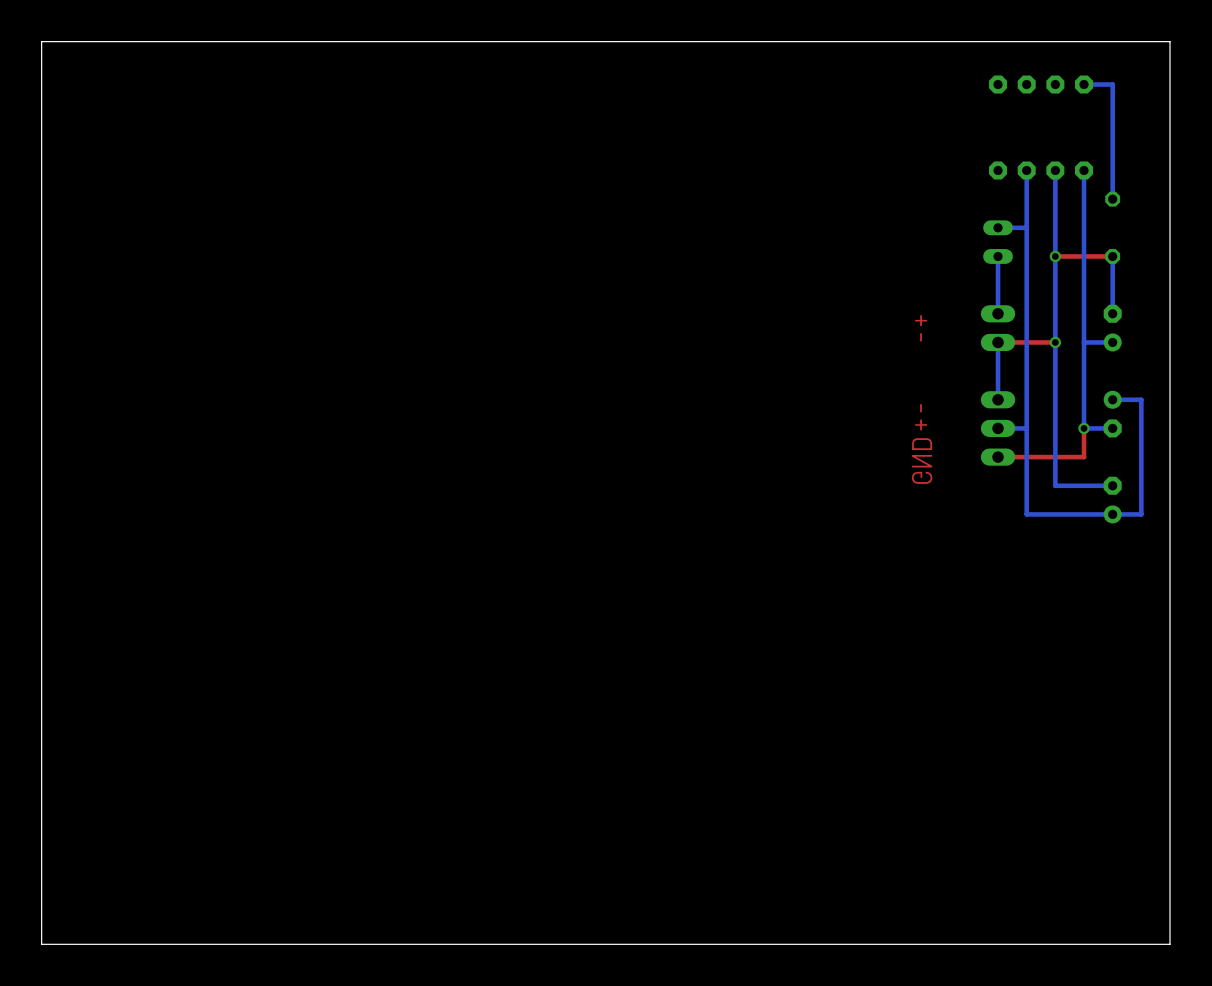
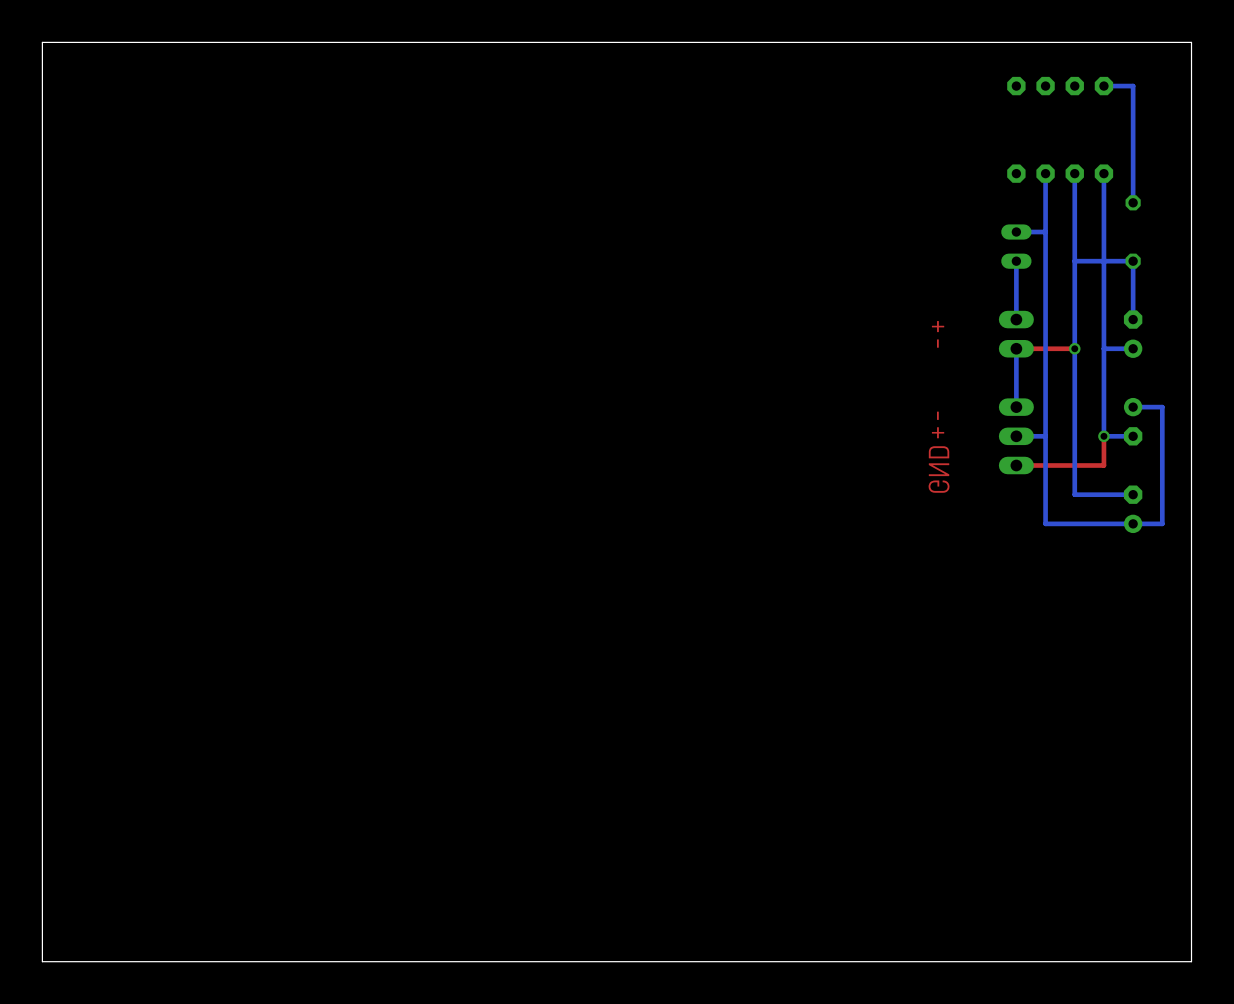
via: (1055, 256) -> none
bottom track: none -> (1133, 261) (1074, 261)
top track: (1112, 256) (1055, 256) -> none

